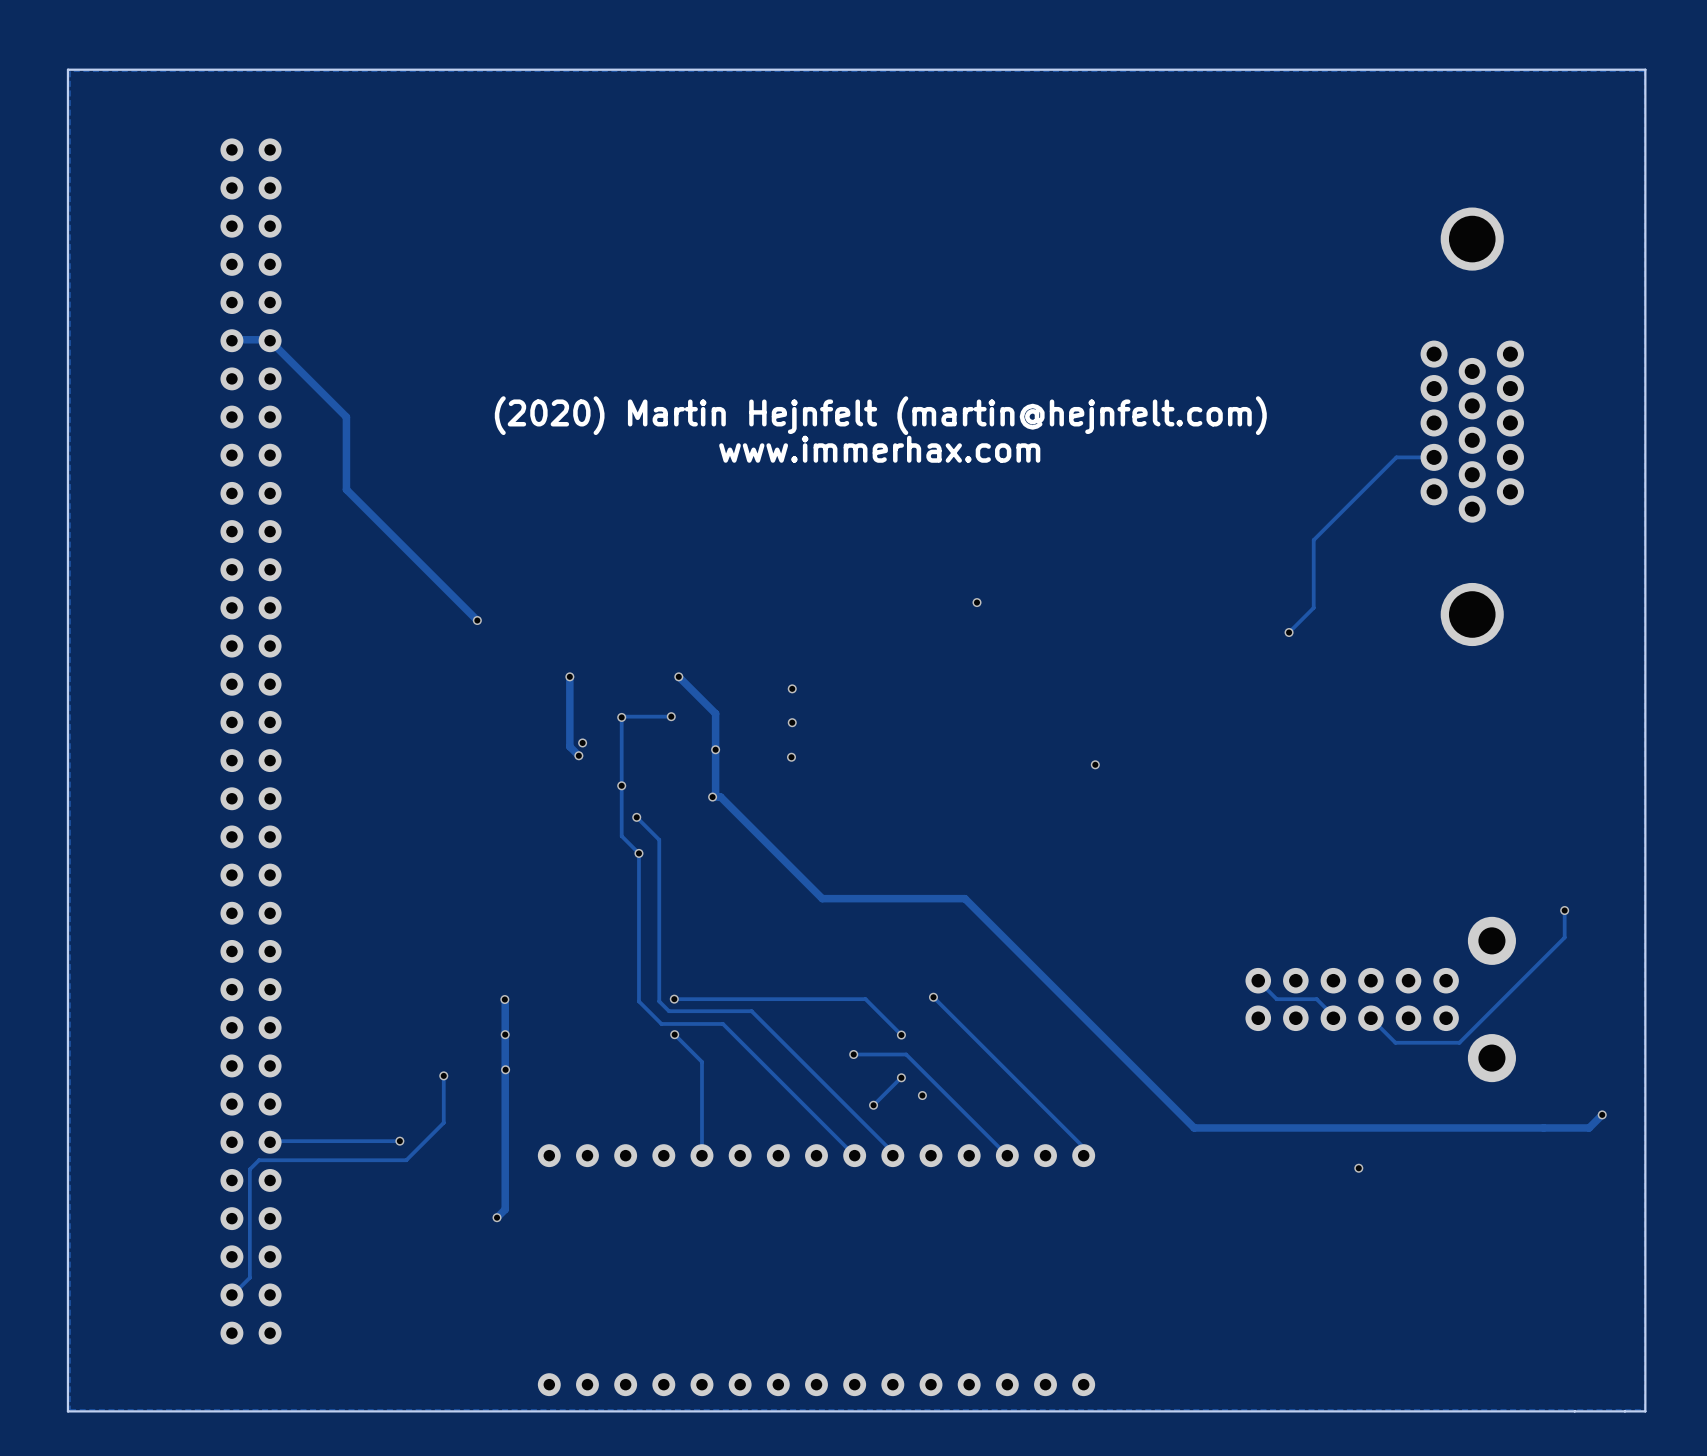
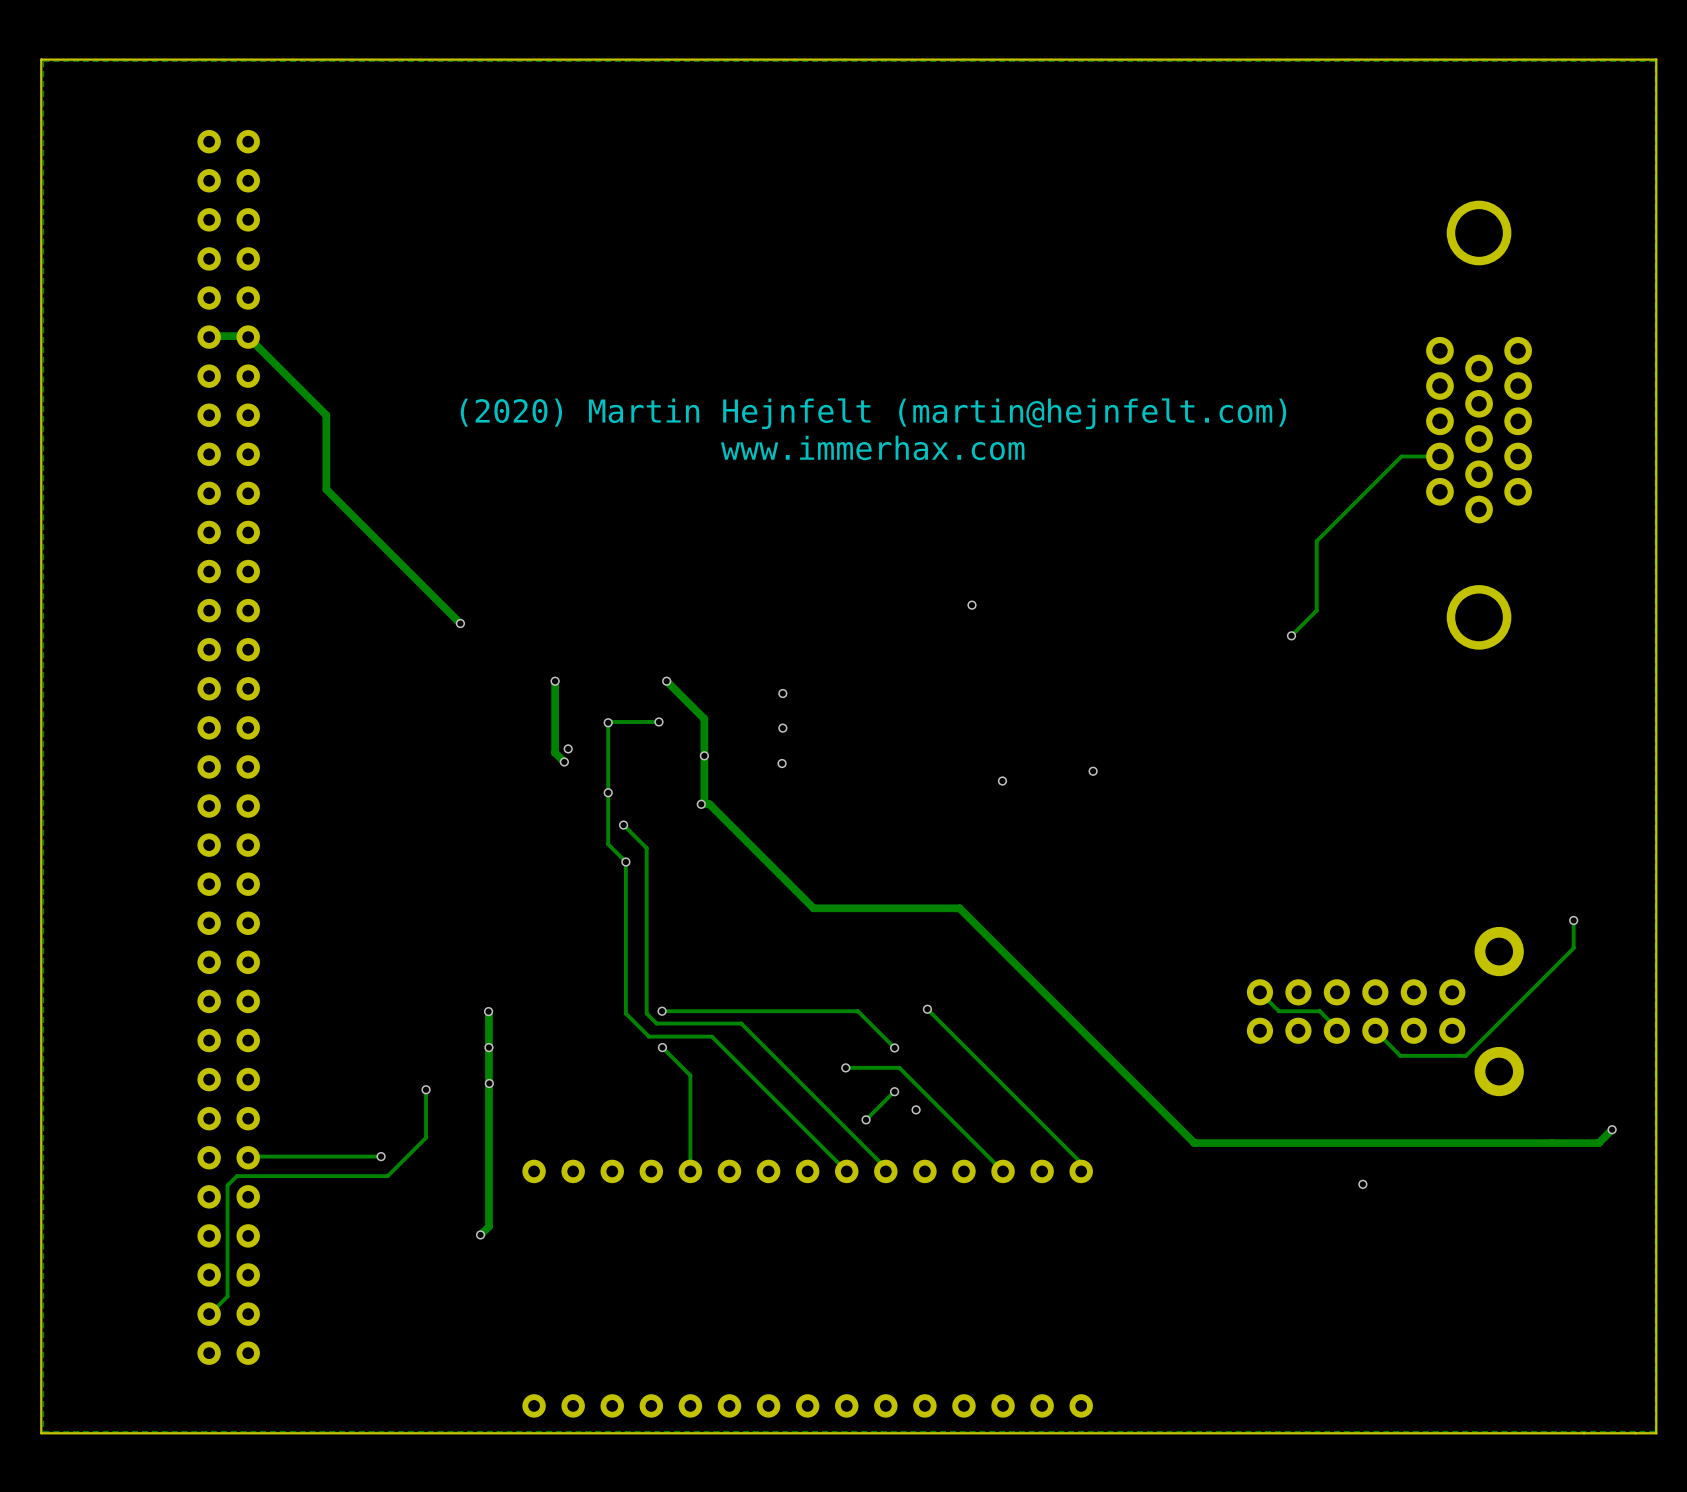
via: none -> (1002, 781)

